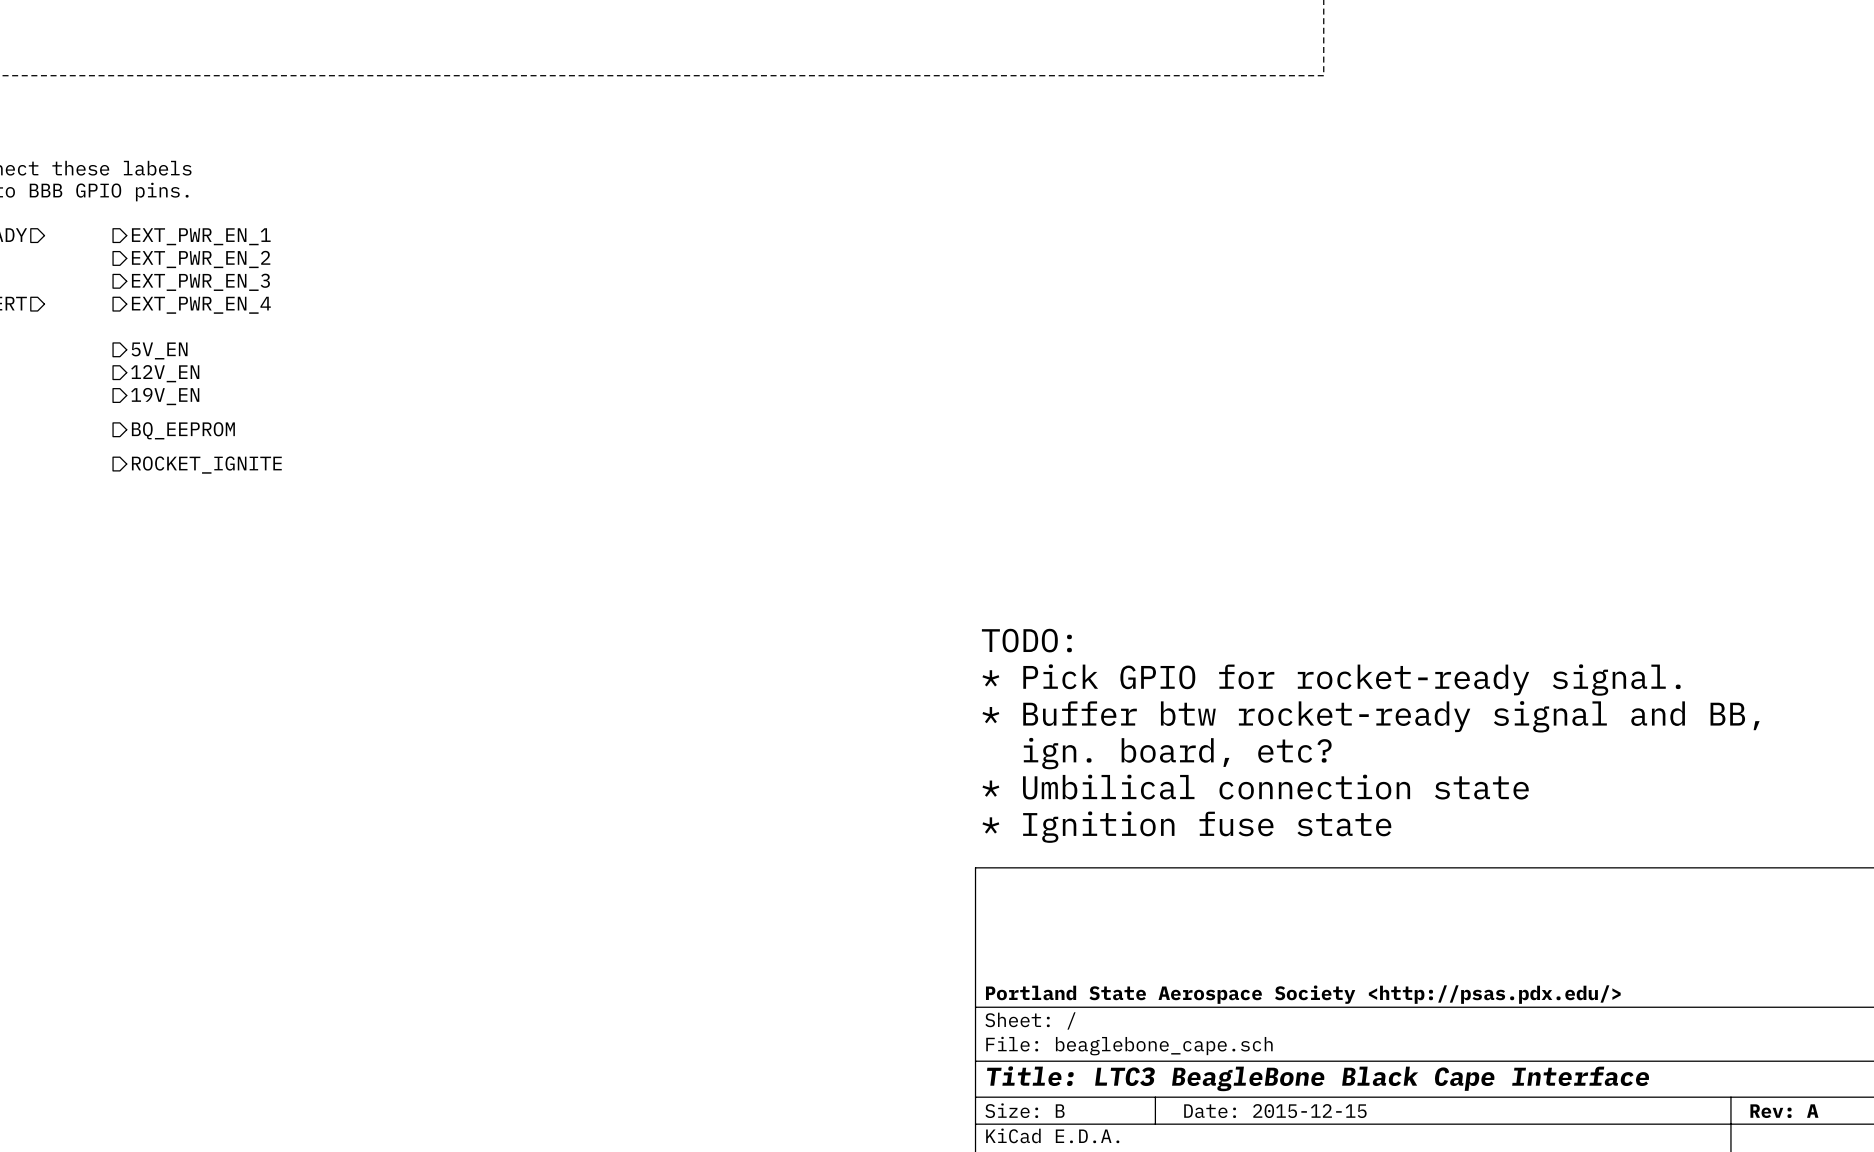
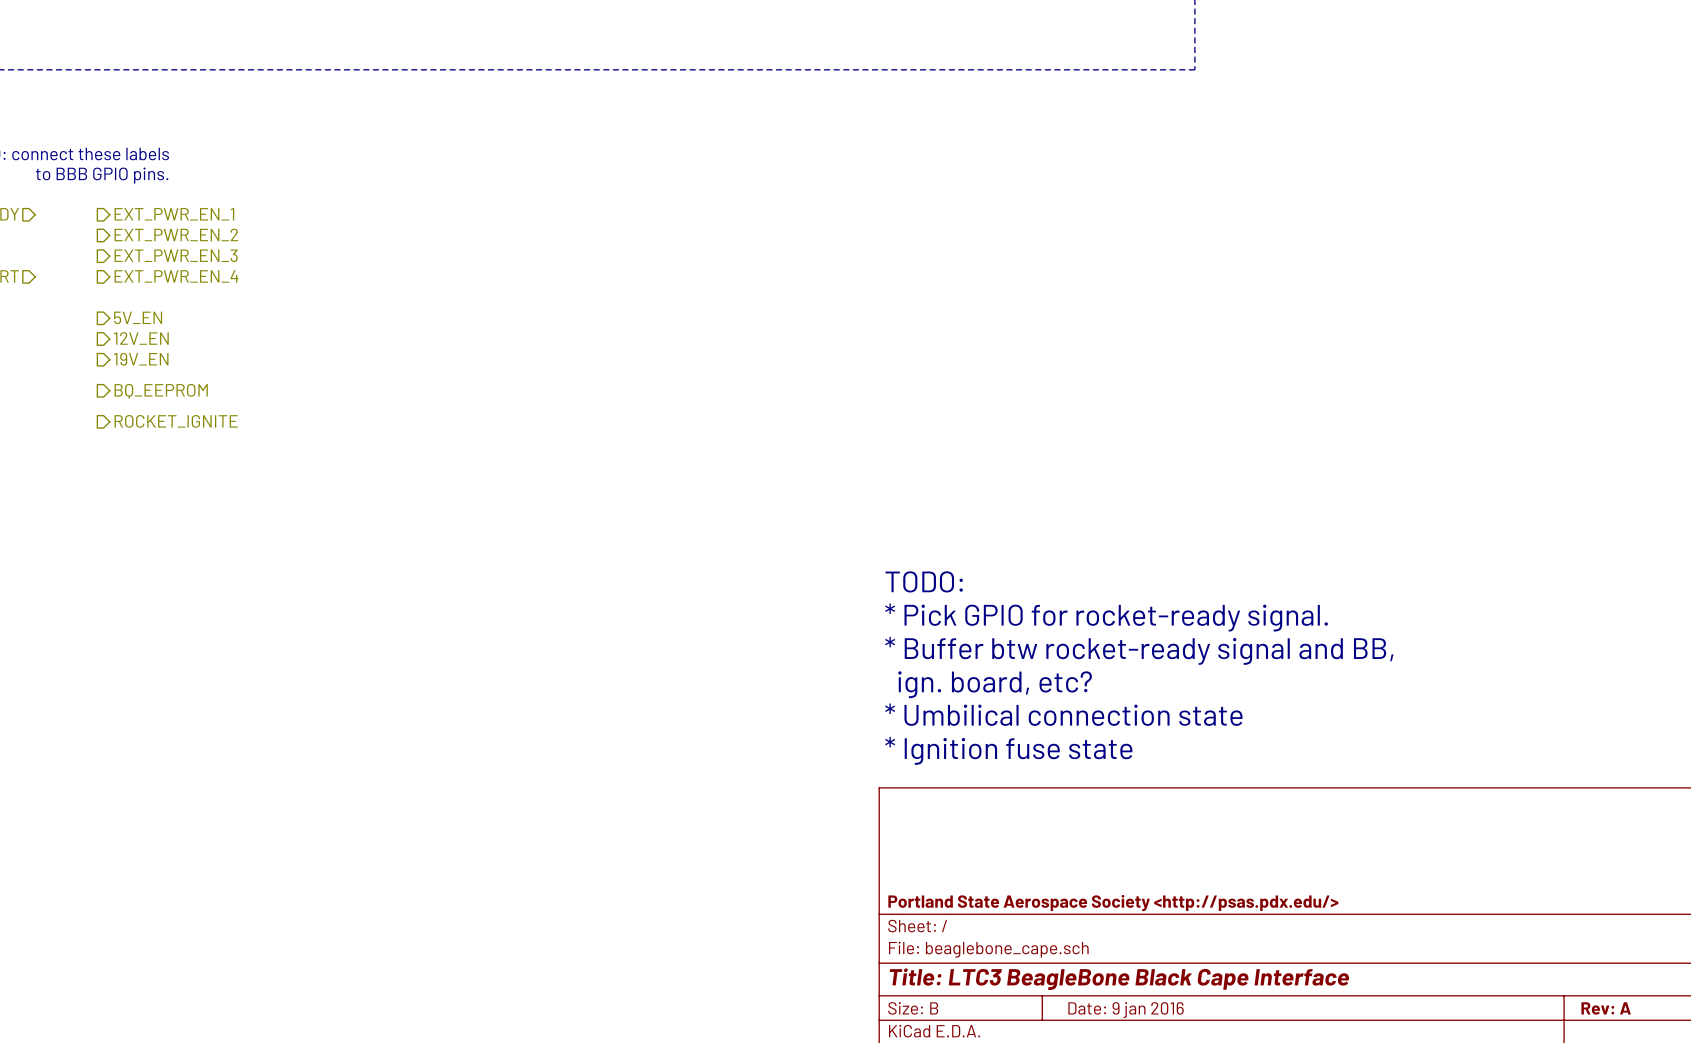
title block: Date: 2015-12-15 (1275, 1111) -> Date: 9 jan 2016 (1126, 1010)

